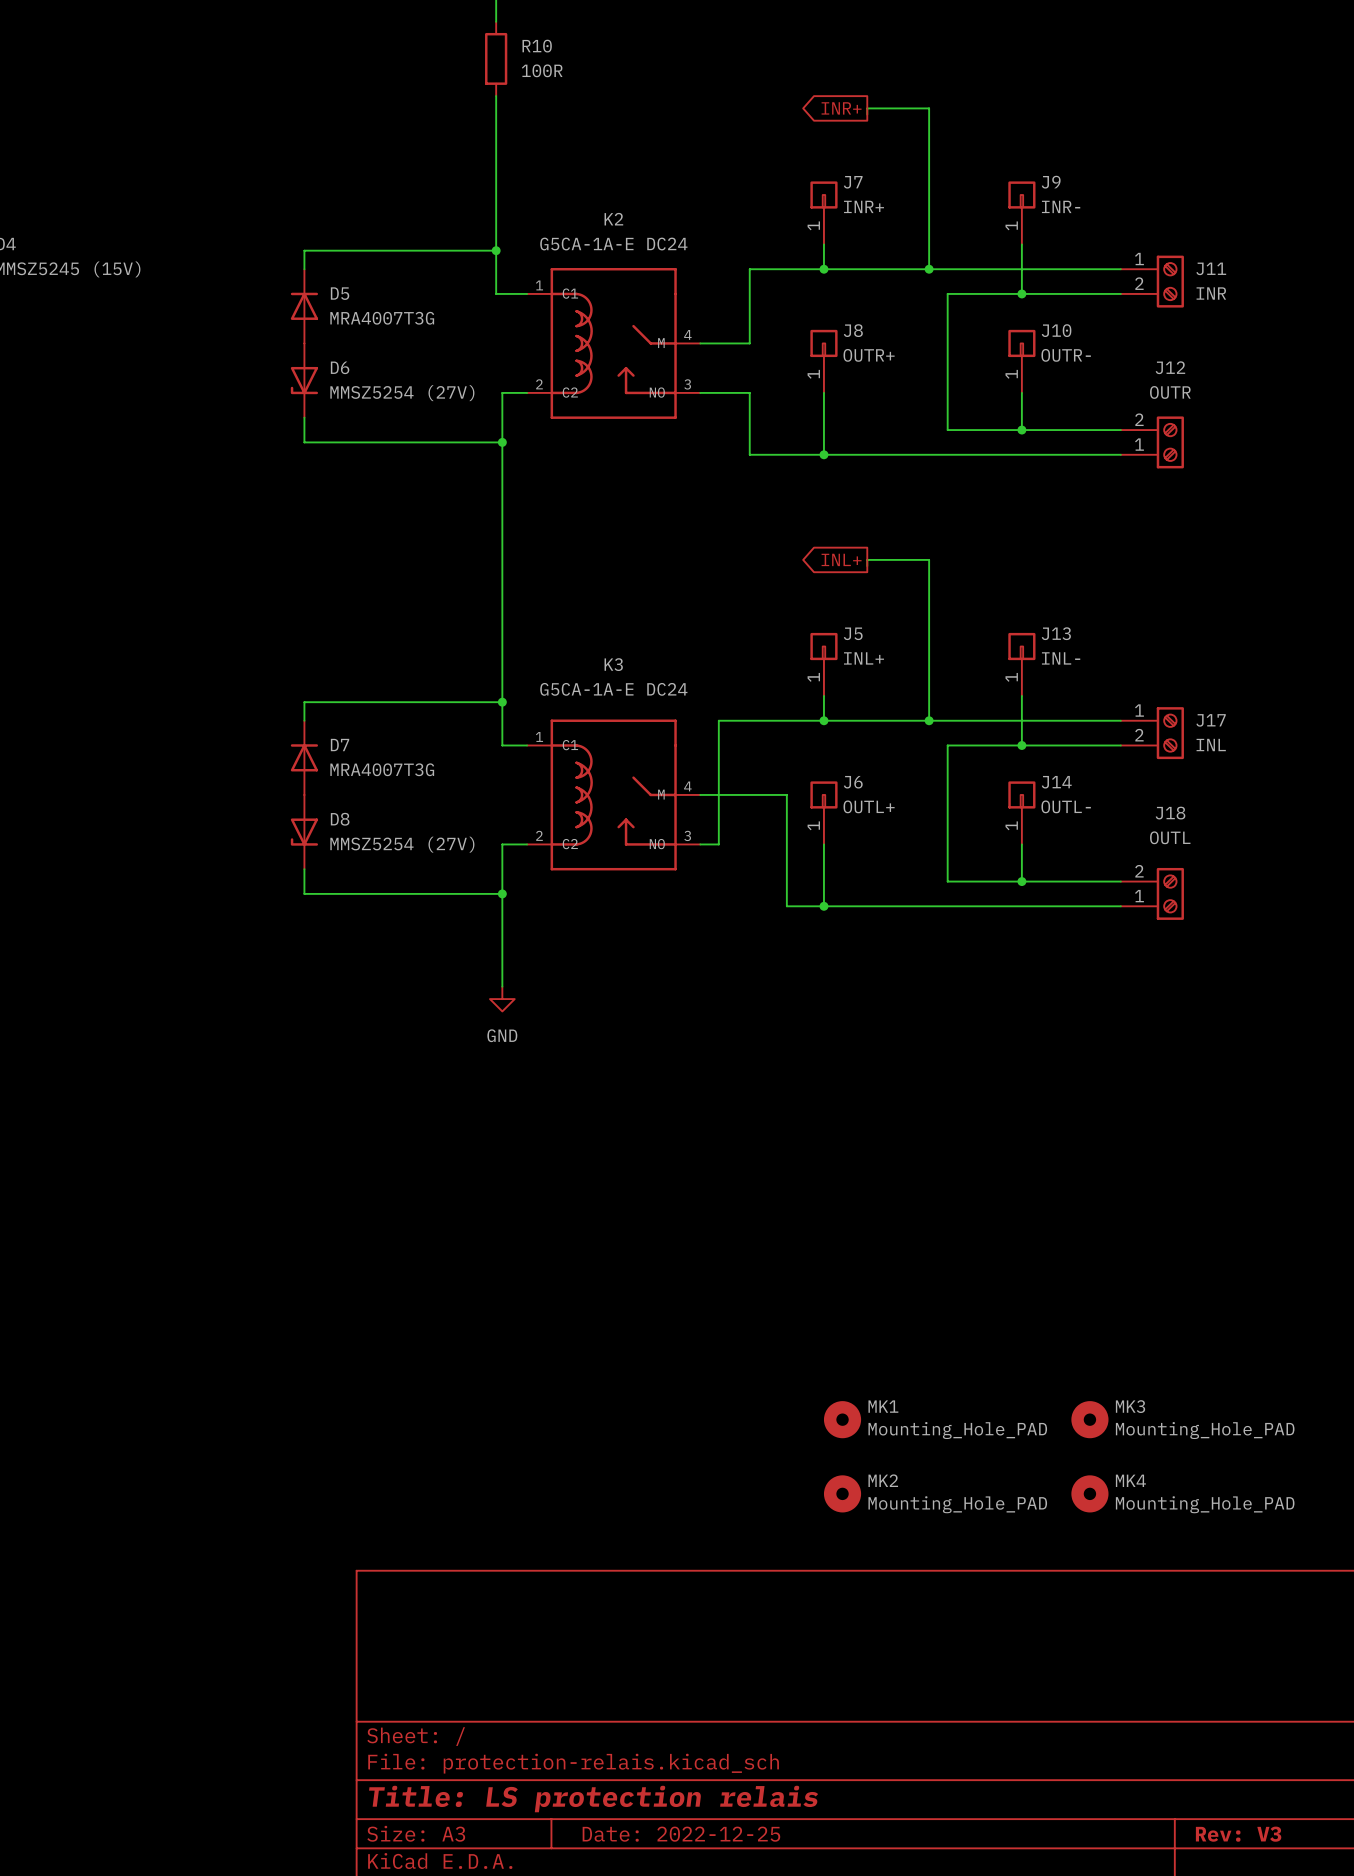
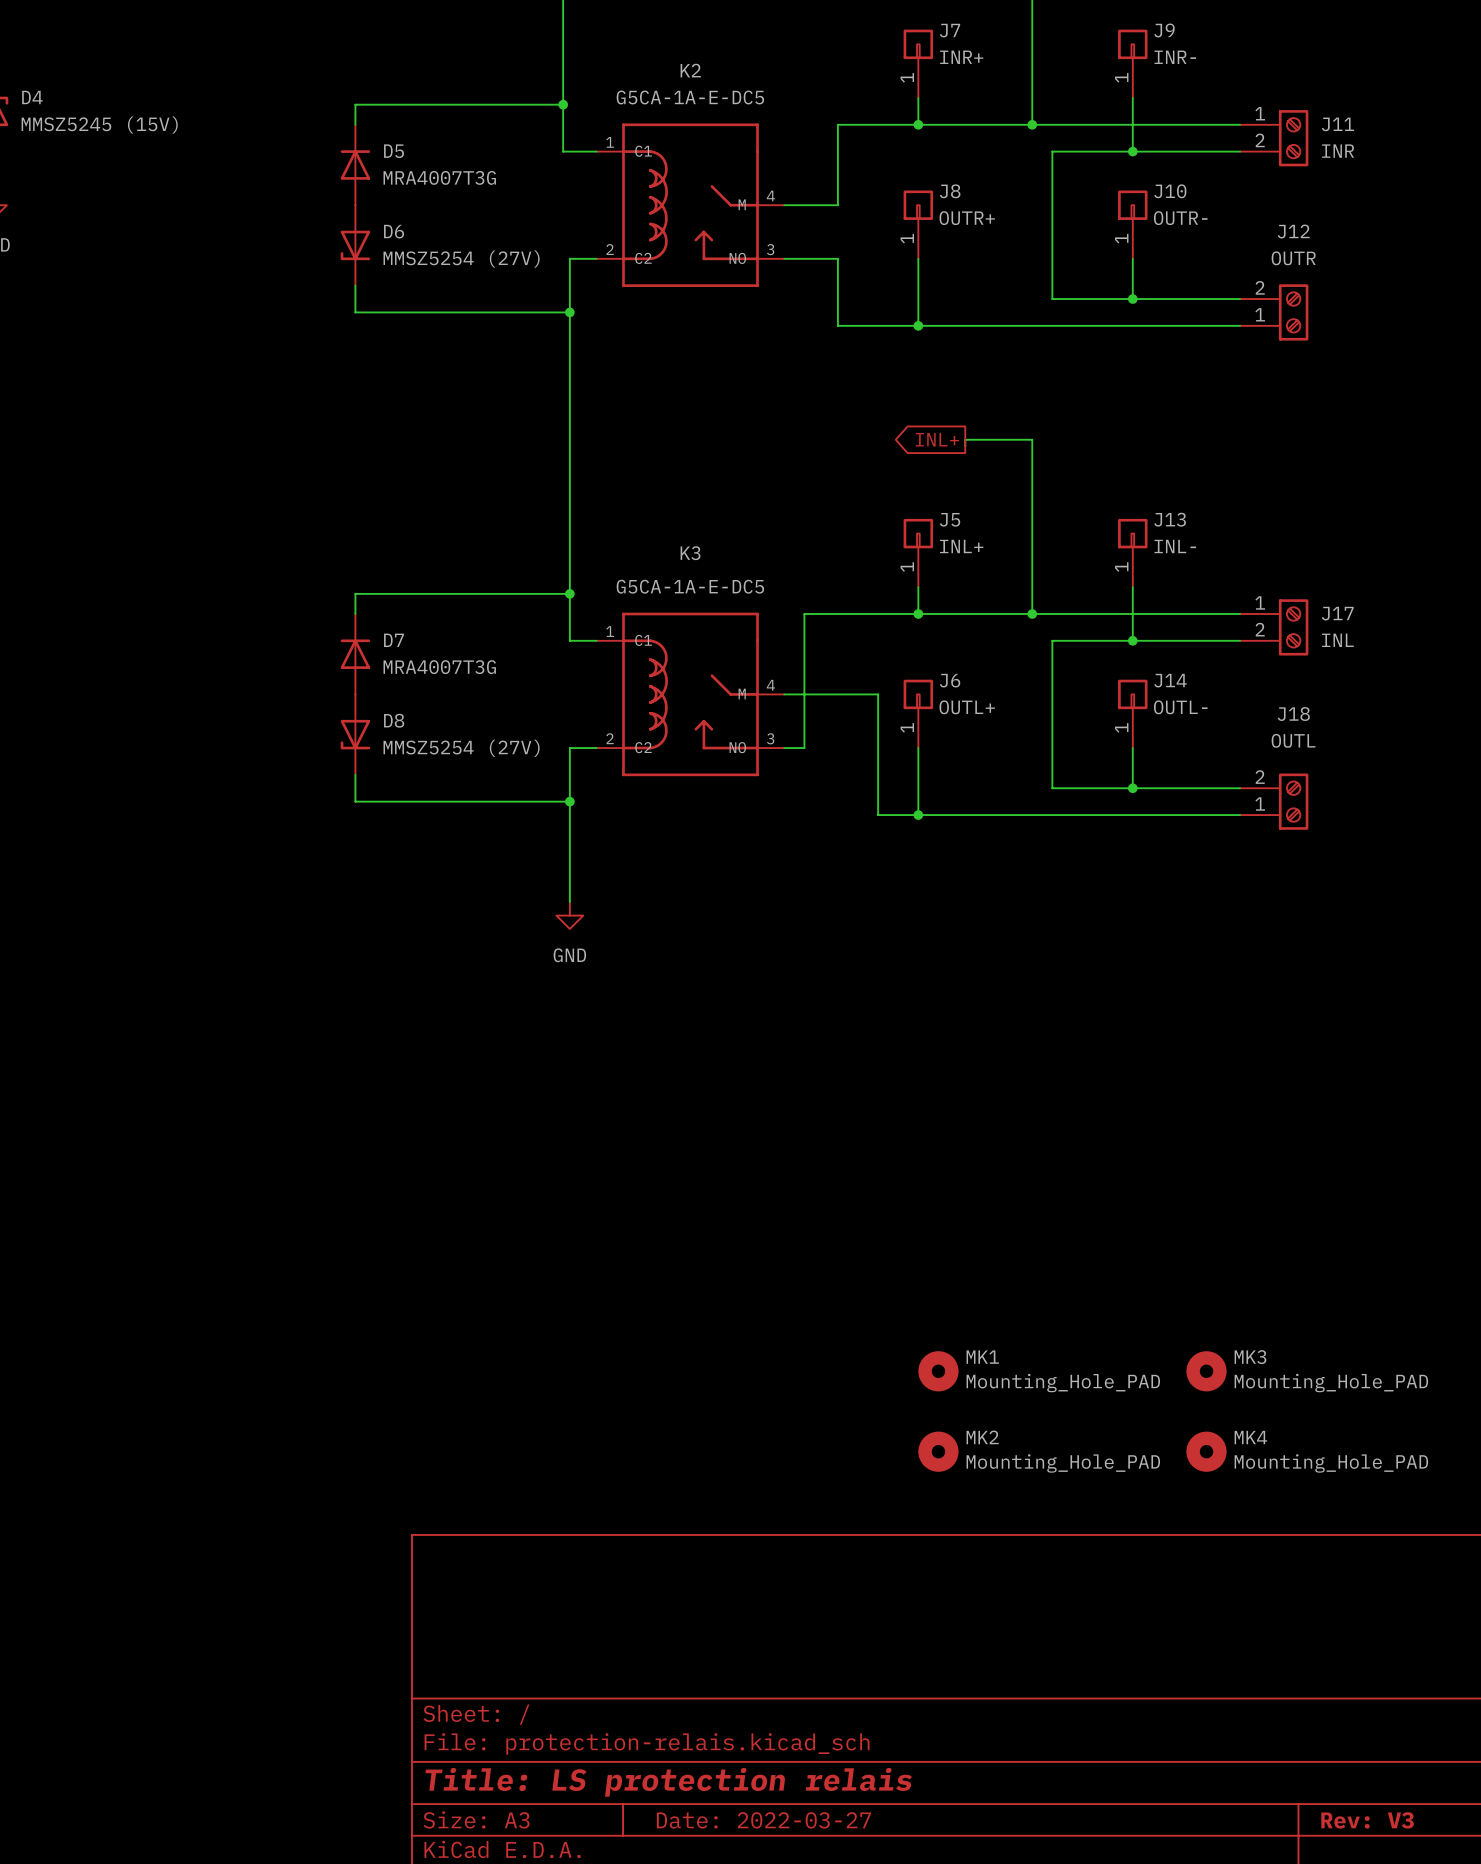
K2 value: G5CA-1A-E DC24 (613, 244) -> G5CA-1A-E-DC5 (690, 97)
K3 value: G5CA-1A-E DC24 (613, 689) -> G5CA-1A-E-DC5 (690, 586)
title block: Date: 2022-12-25 (681, 1834) -> Date: 2022-03-27 (763, 1820)

